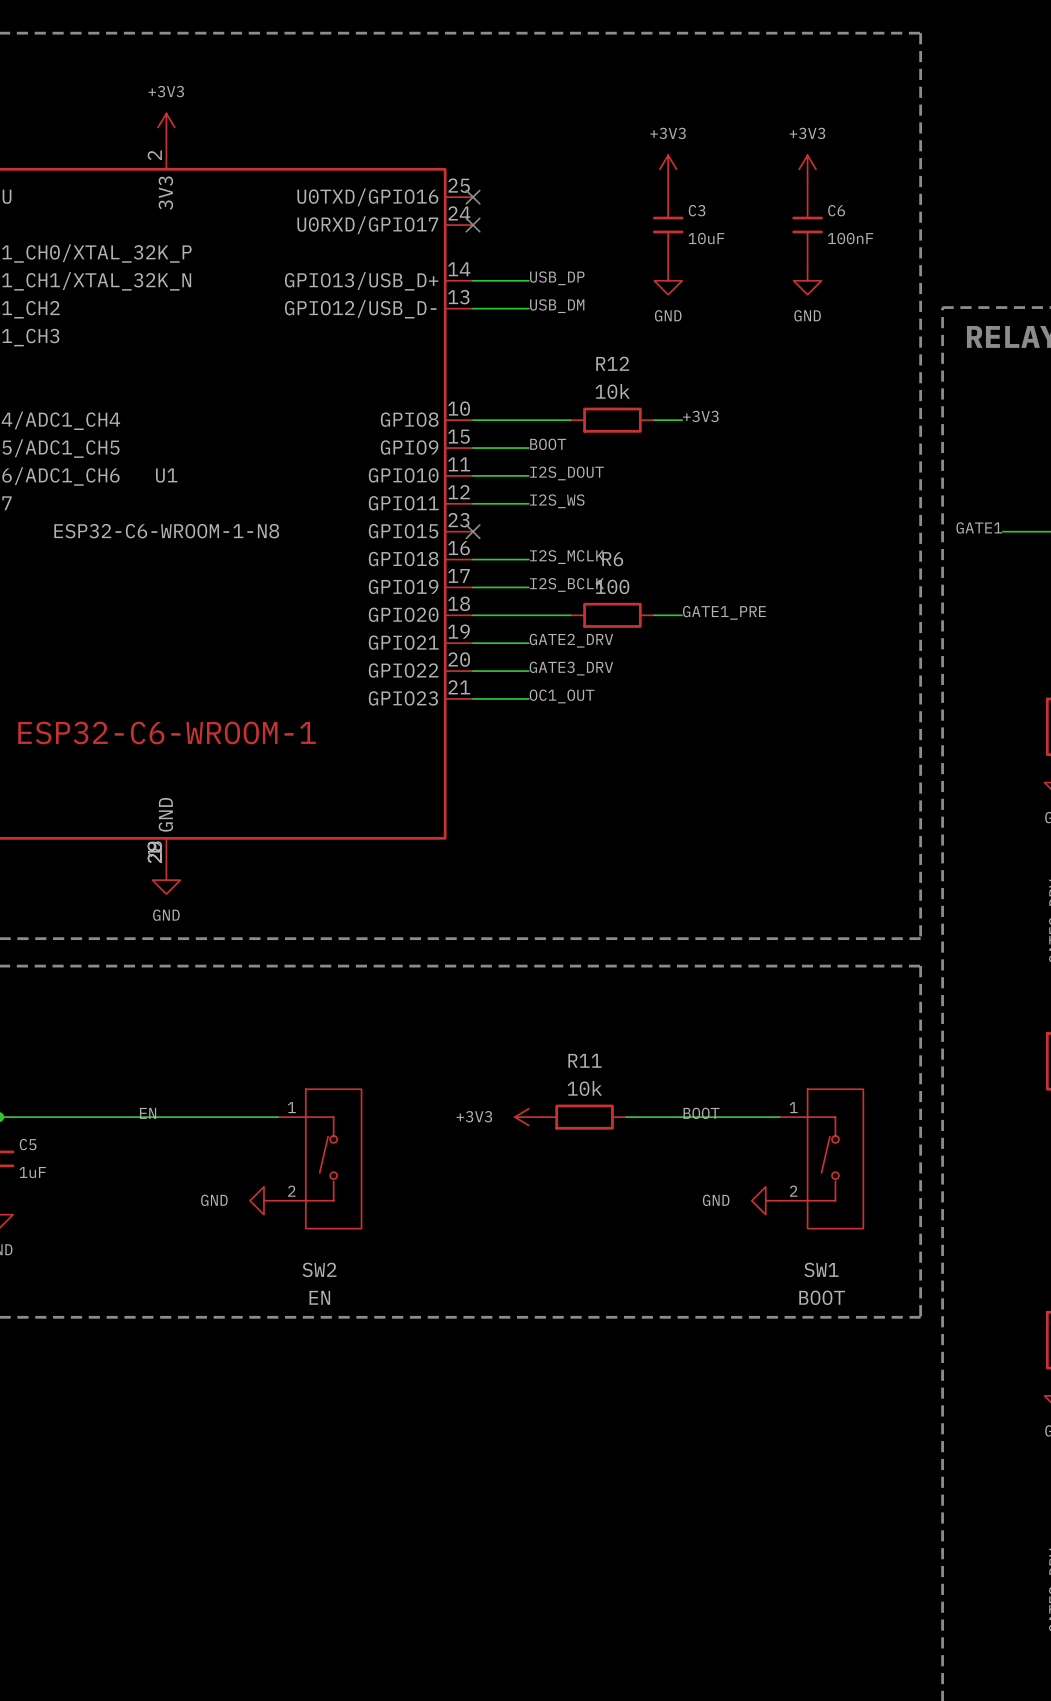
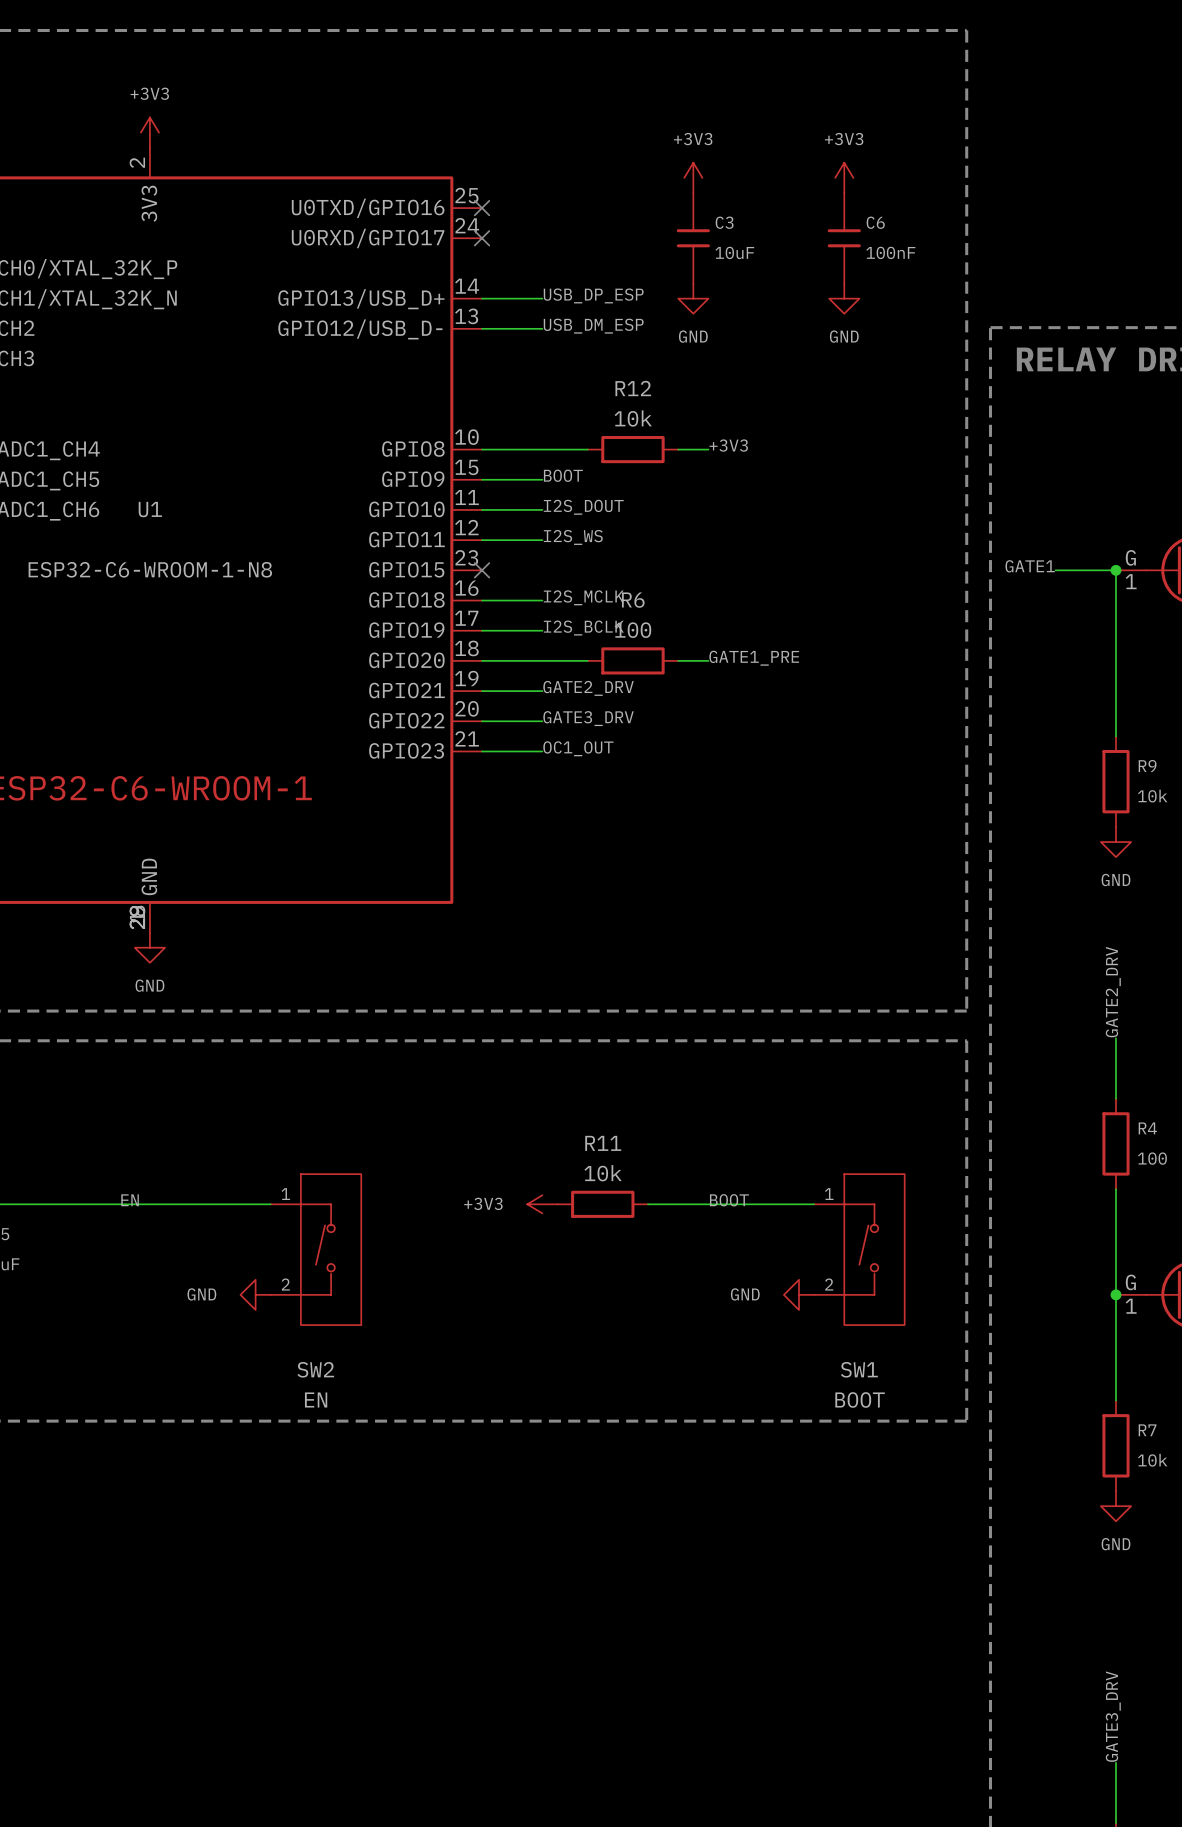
label: USB_DP (557, 278) -> USB_DP_ESP (593, 295)
label: USB_DM (557, 306) -> USB_DM_ESP (593, 326)

